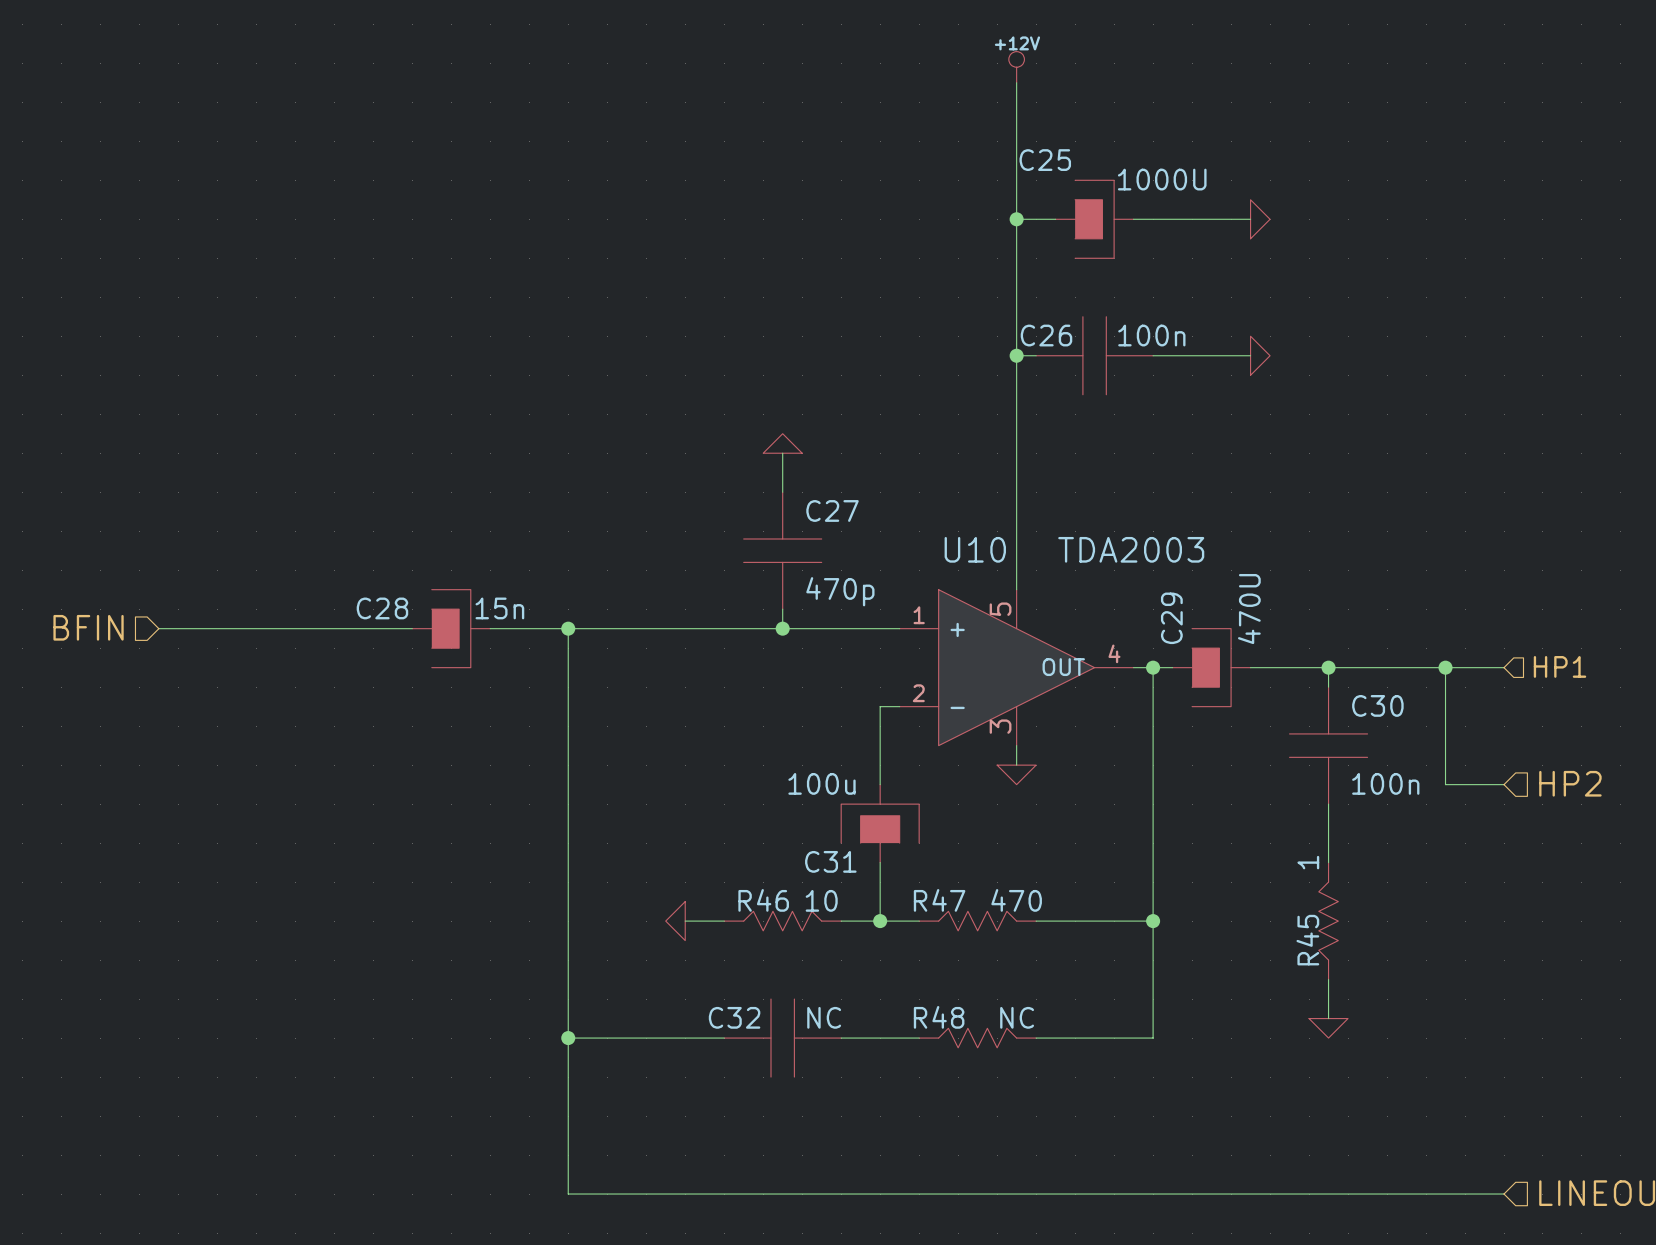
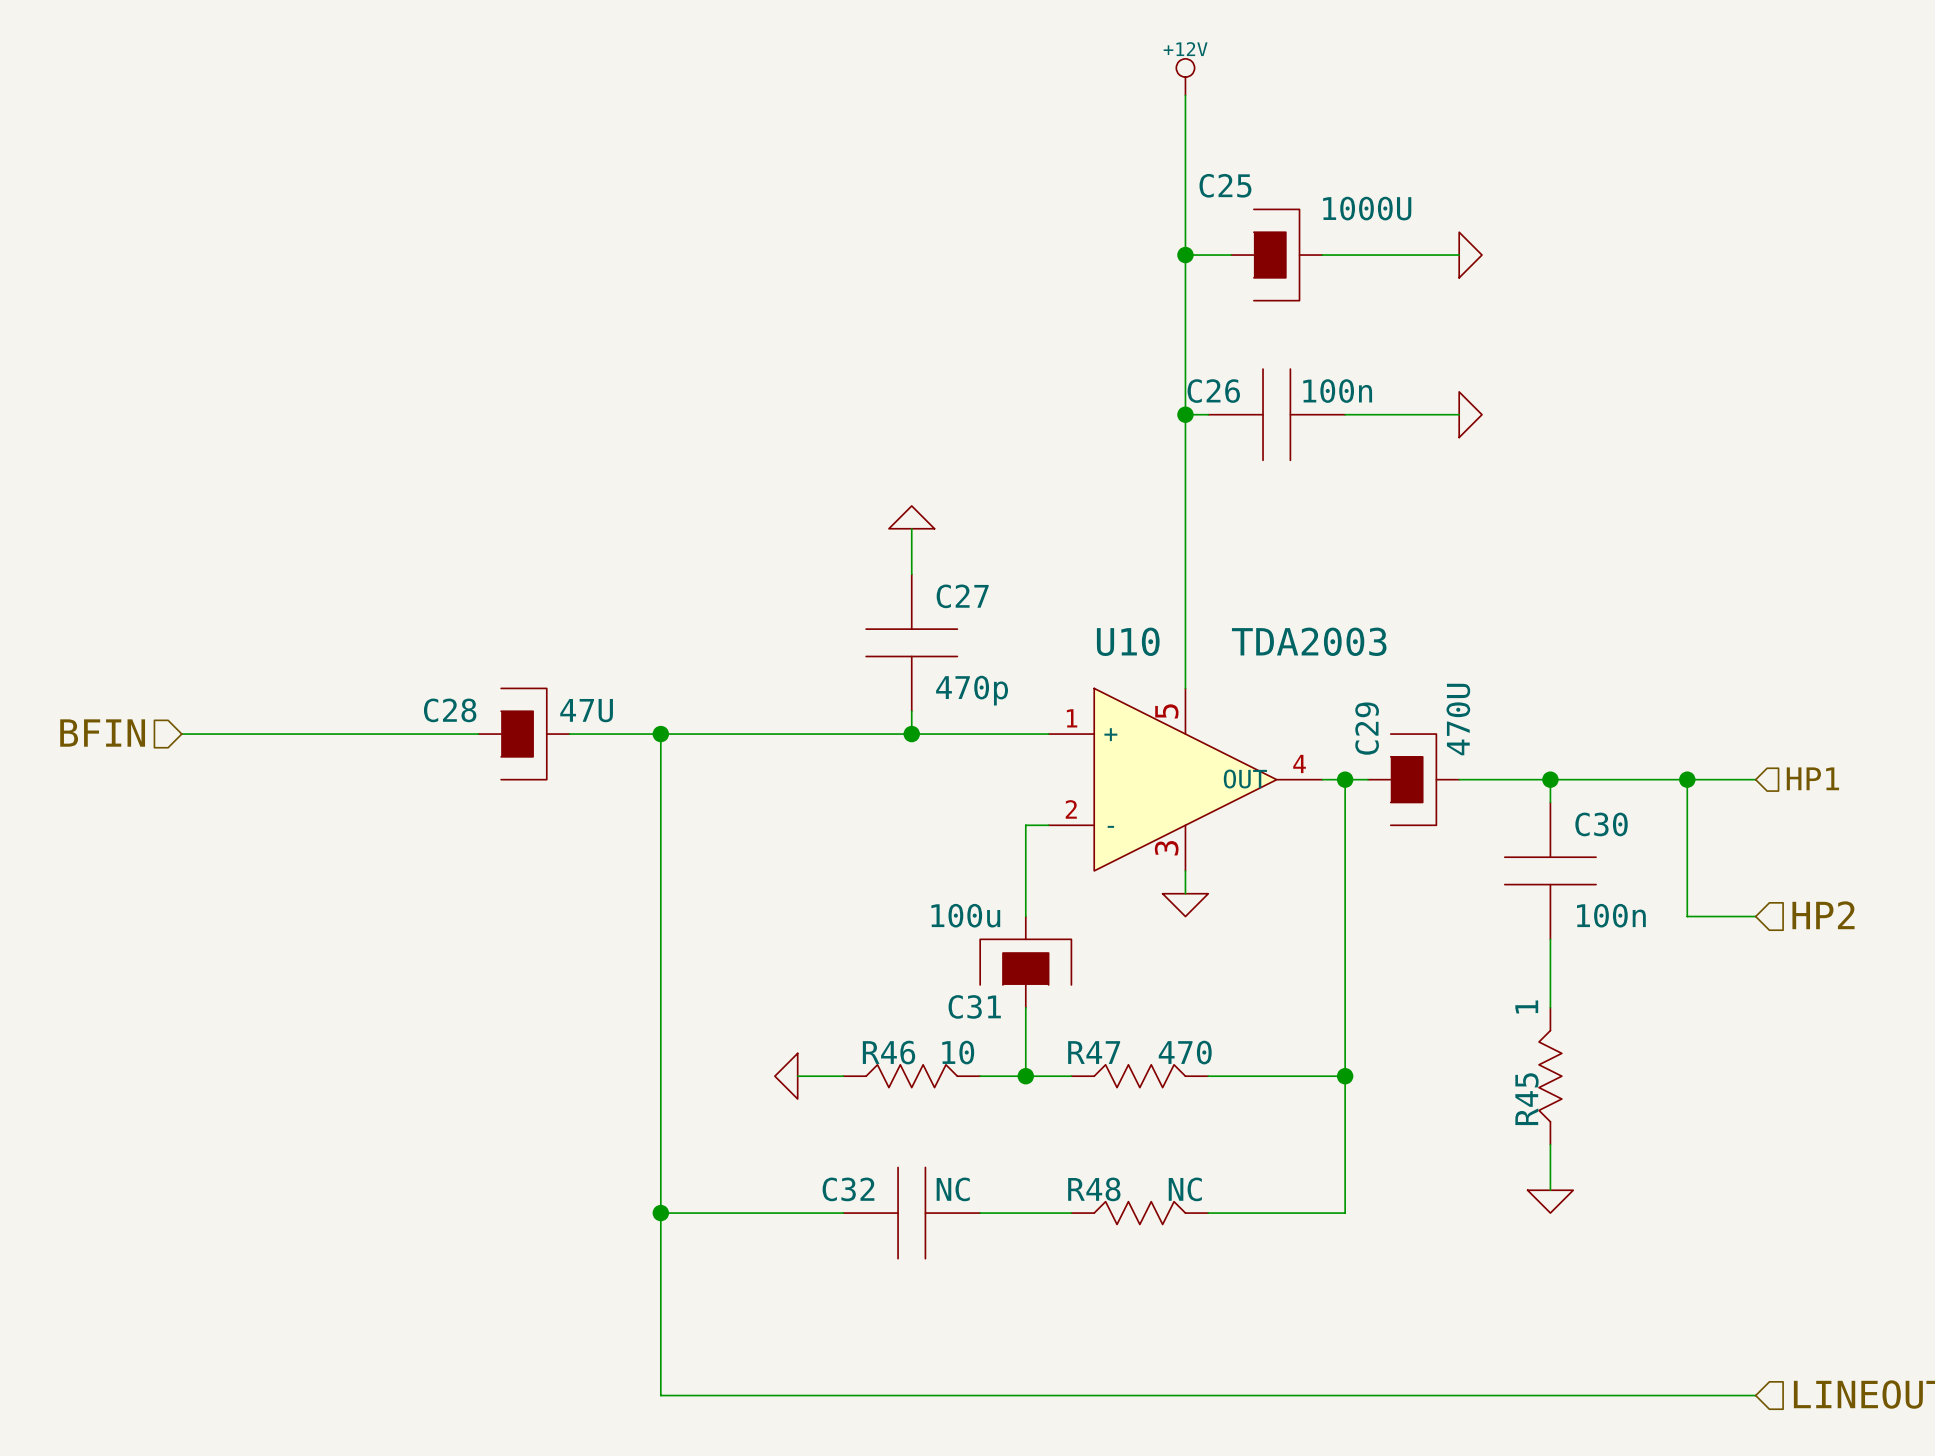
C28 value: 15n (499, 608) -> 47U (586, 710)

